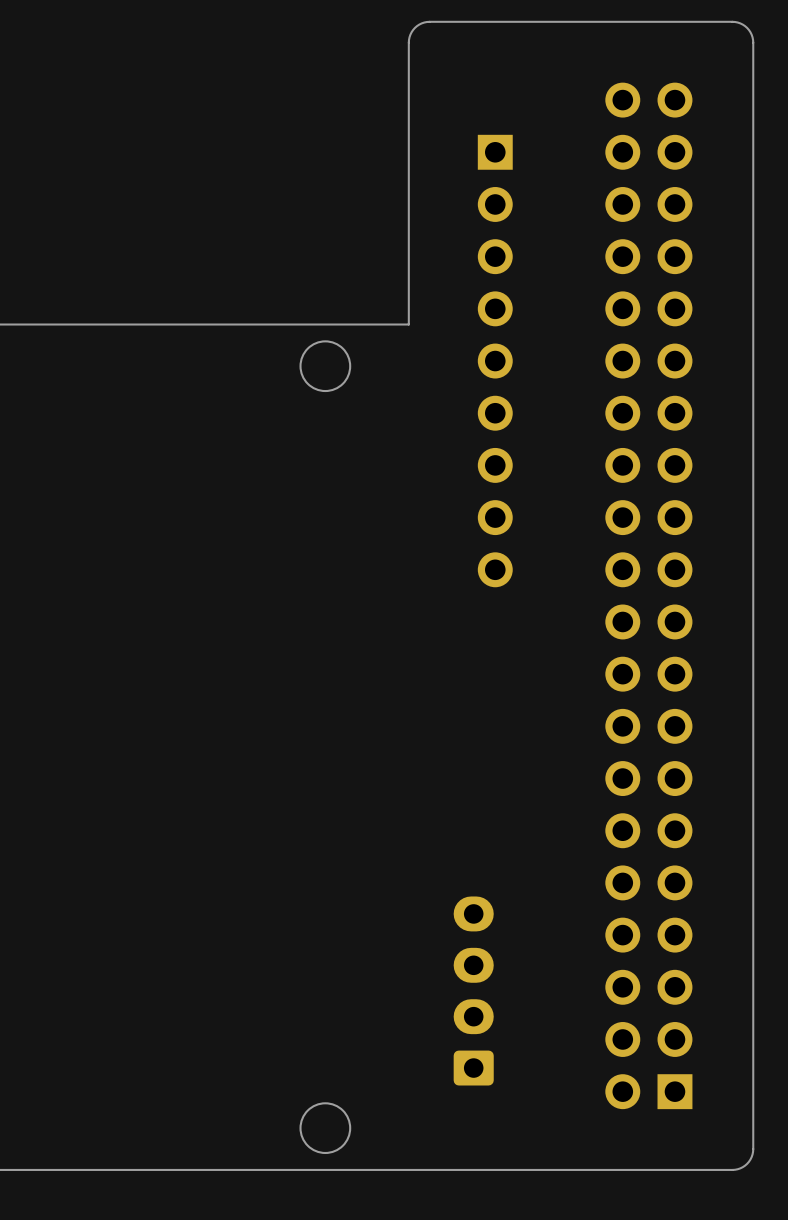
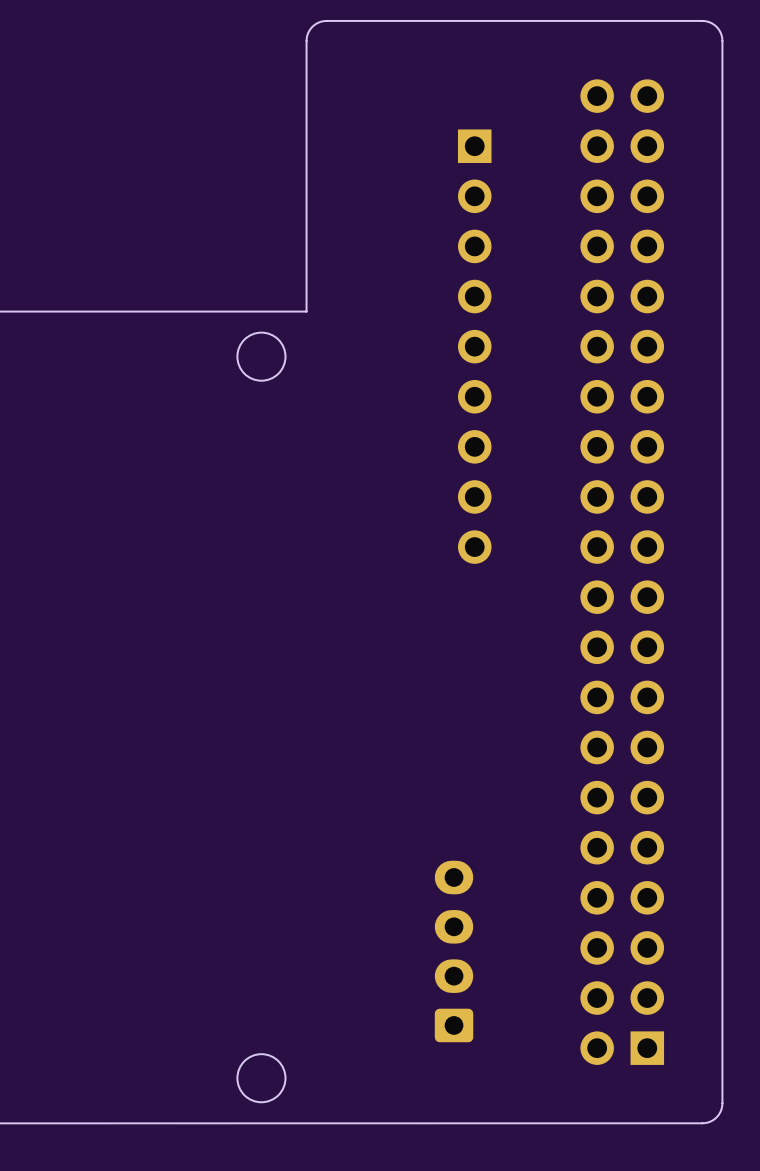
board edge: (429, 21) (421, 23) (414, 27) (409, 39) (408, 324) (320, 324) -> (411, 20) (323, 21) (314, 25) (308, 33) (306, 311)
round board edge: [299, 340, 352, 393] -> none
round board edge: none -> [236, 331, 287, 382]
round board edge: none -> [236, 1053, 287, 1104]
round board edge: [299, 1102, 352, 1155] -> none

